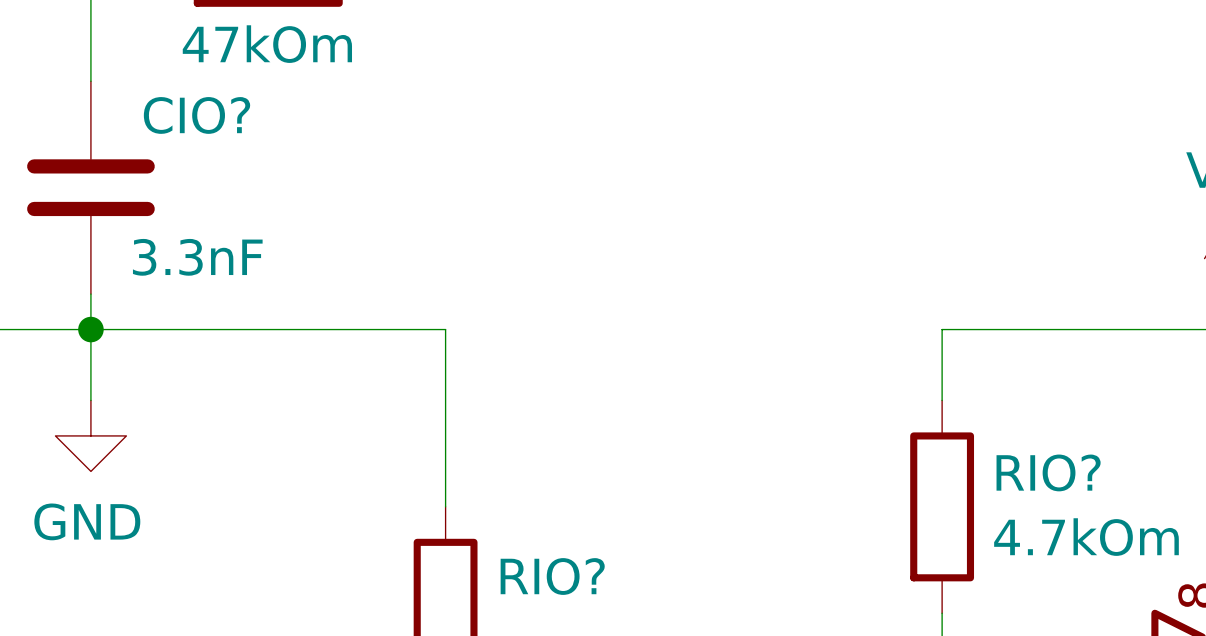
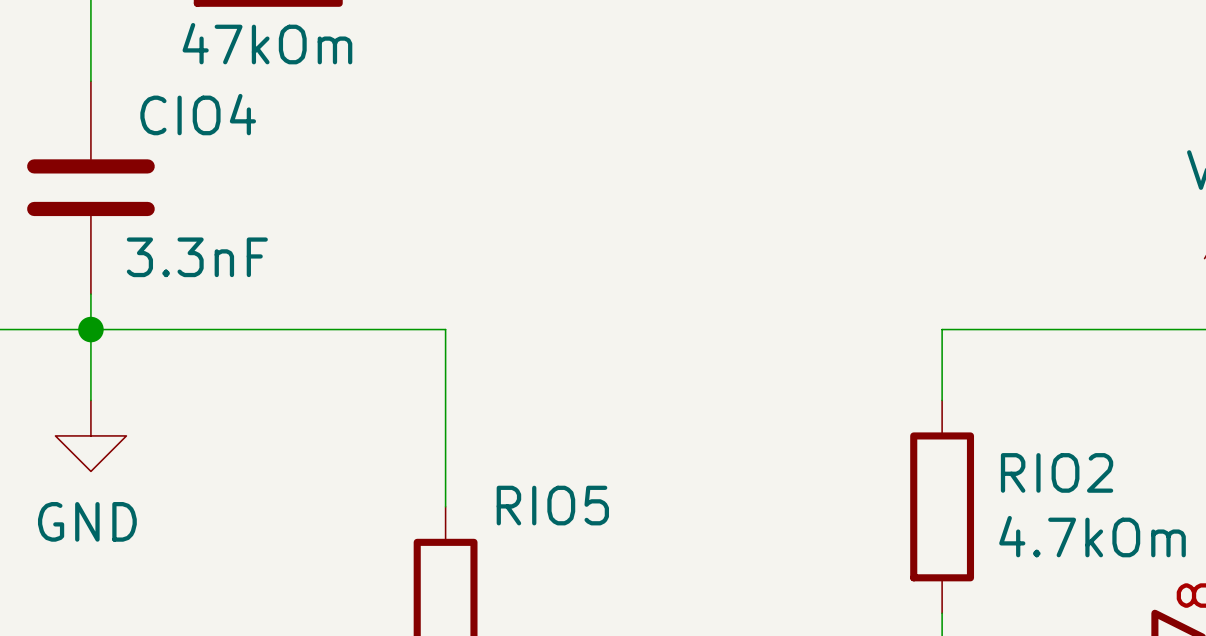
CIO? name: CIO? (197, 115) -> CIO4 (198, 114)
RIO? name: RIO? (1048, 472) -> RIO2 (1057, 472)
RIO? name: RIO? (552, 576) -> RIO5 (552, 505)

